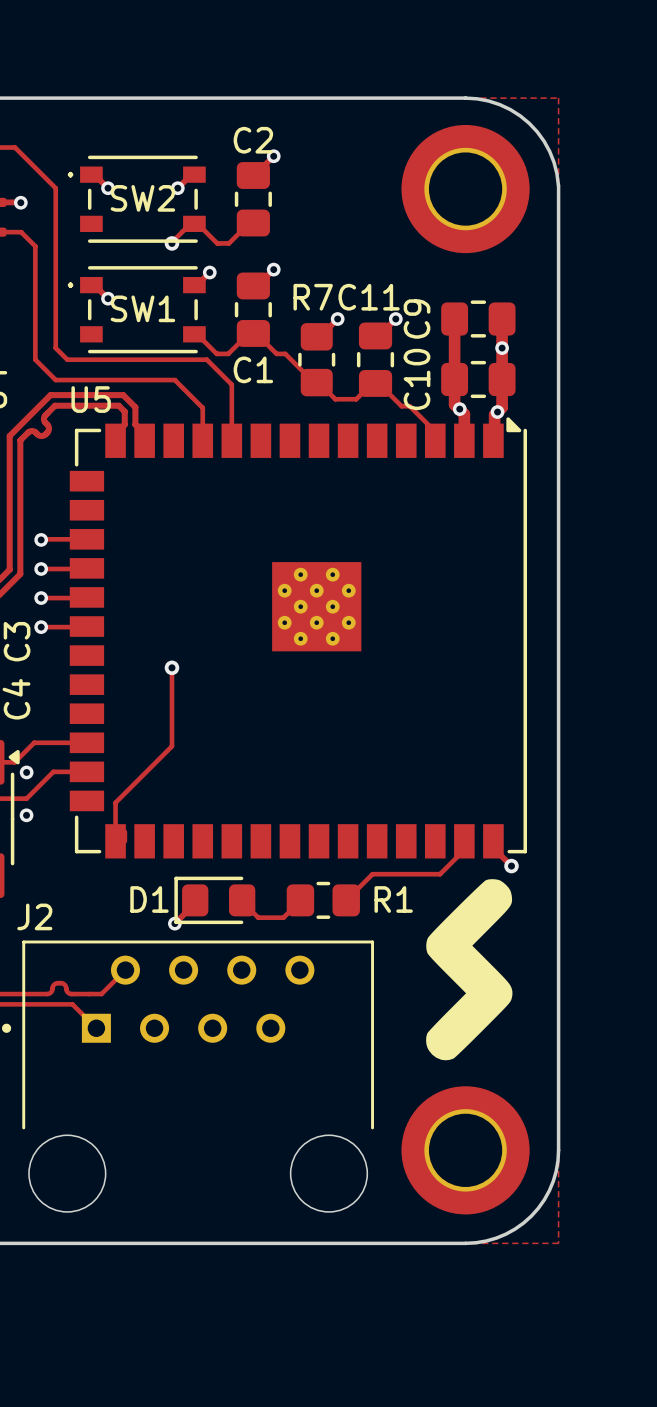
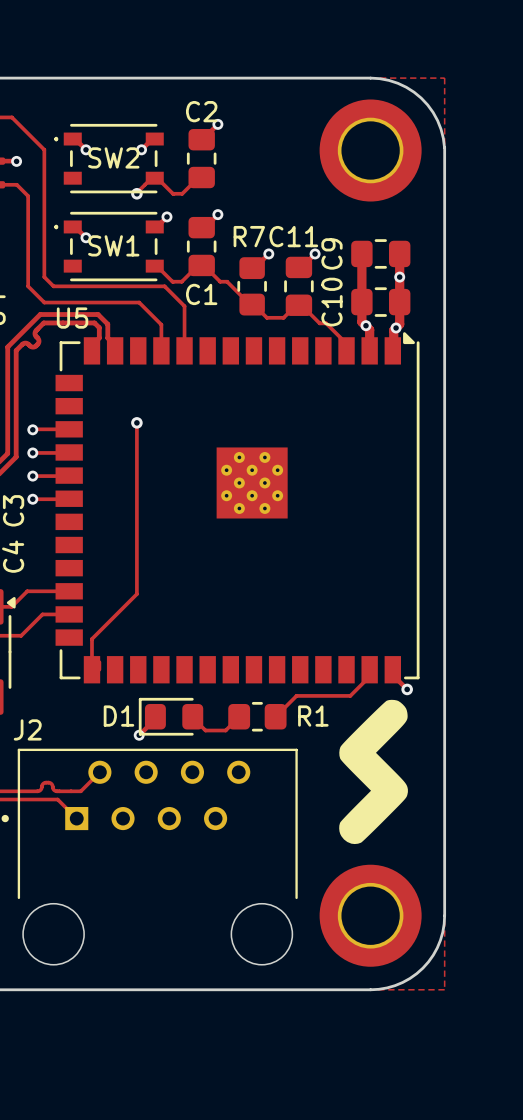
track: none -> (136, 422) (136, 531)
via position: (171, 667) -> (136, 422)
via: (26, 772) -> none
via: (26, 815) -> none

